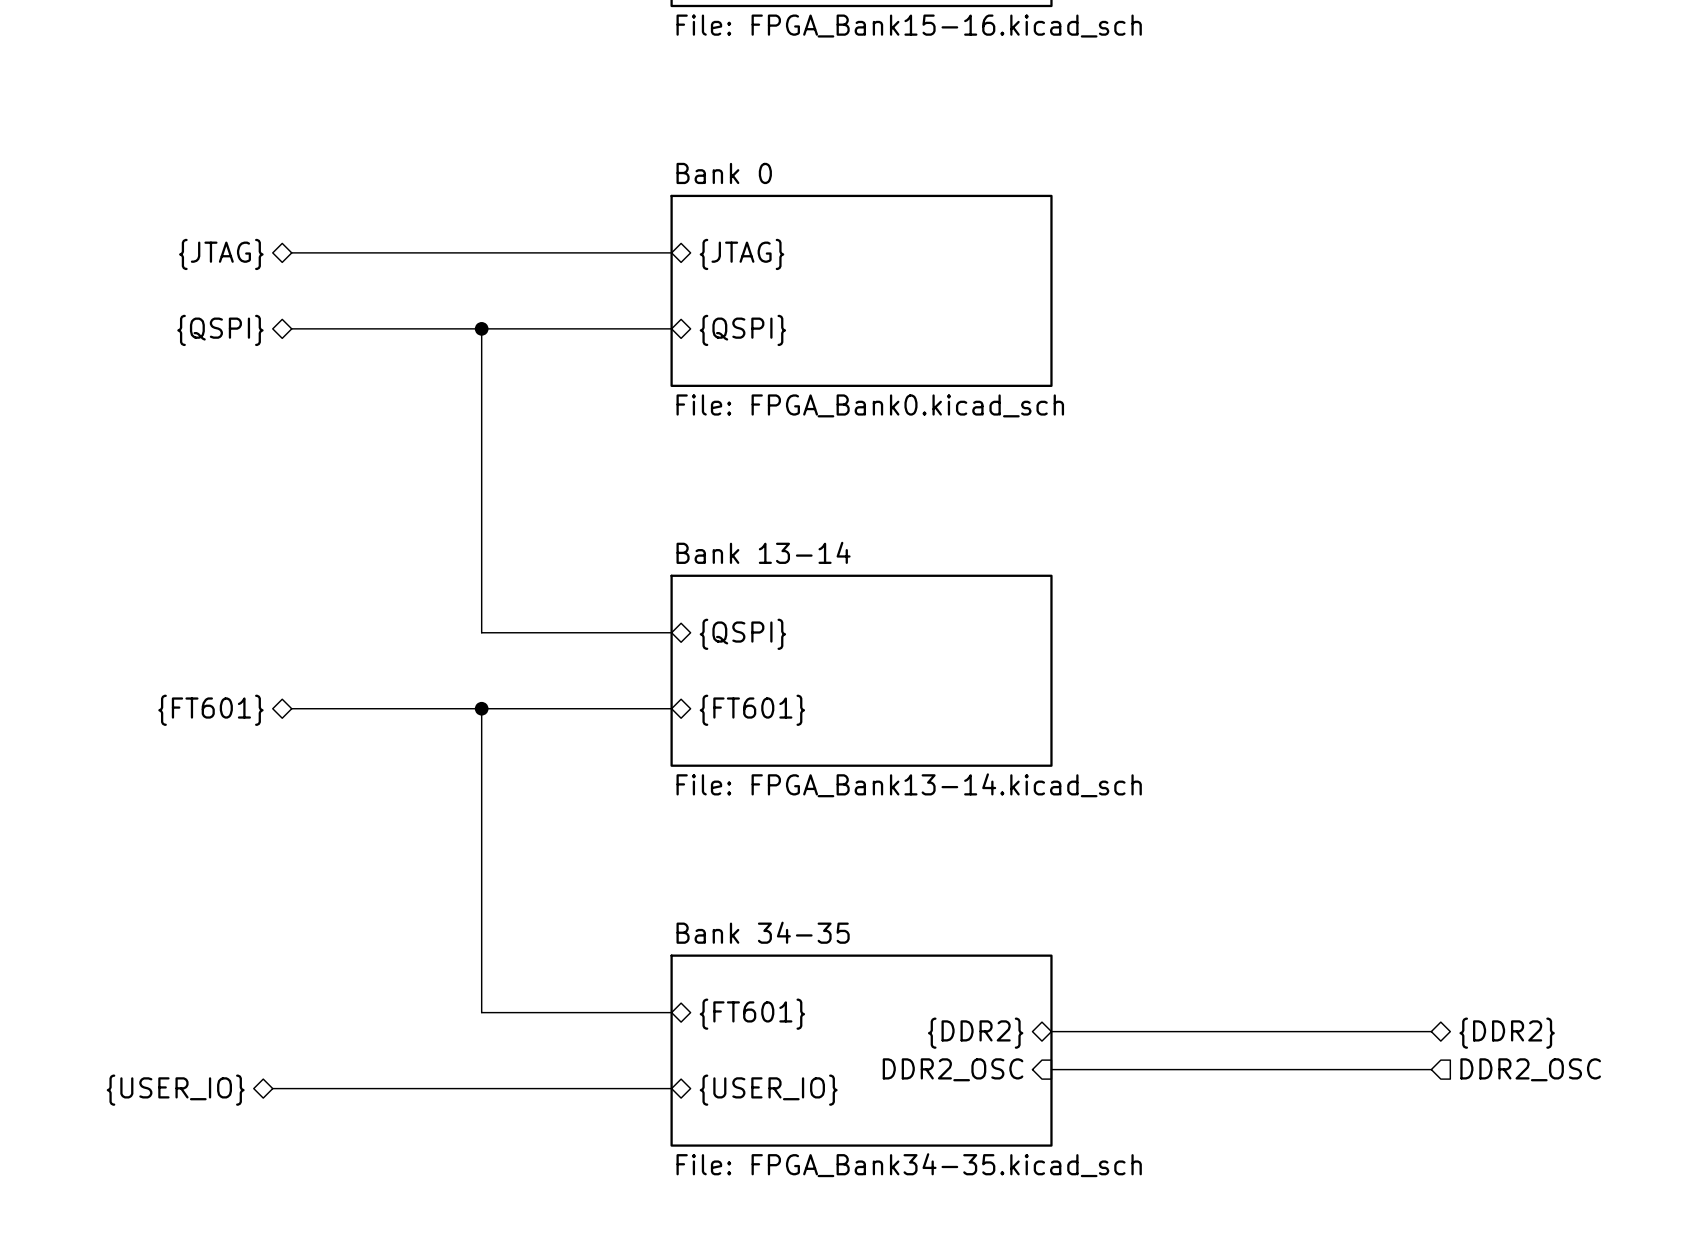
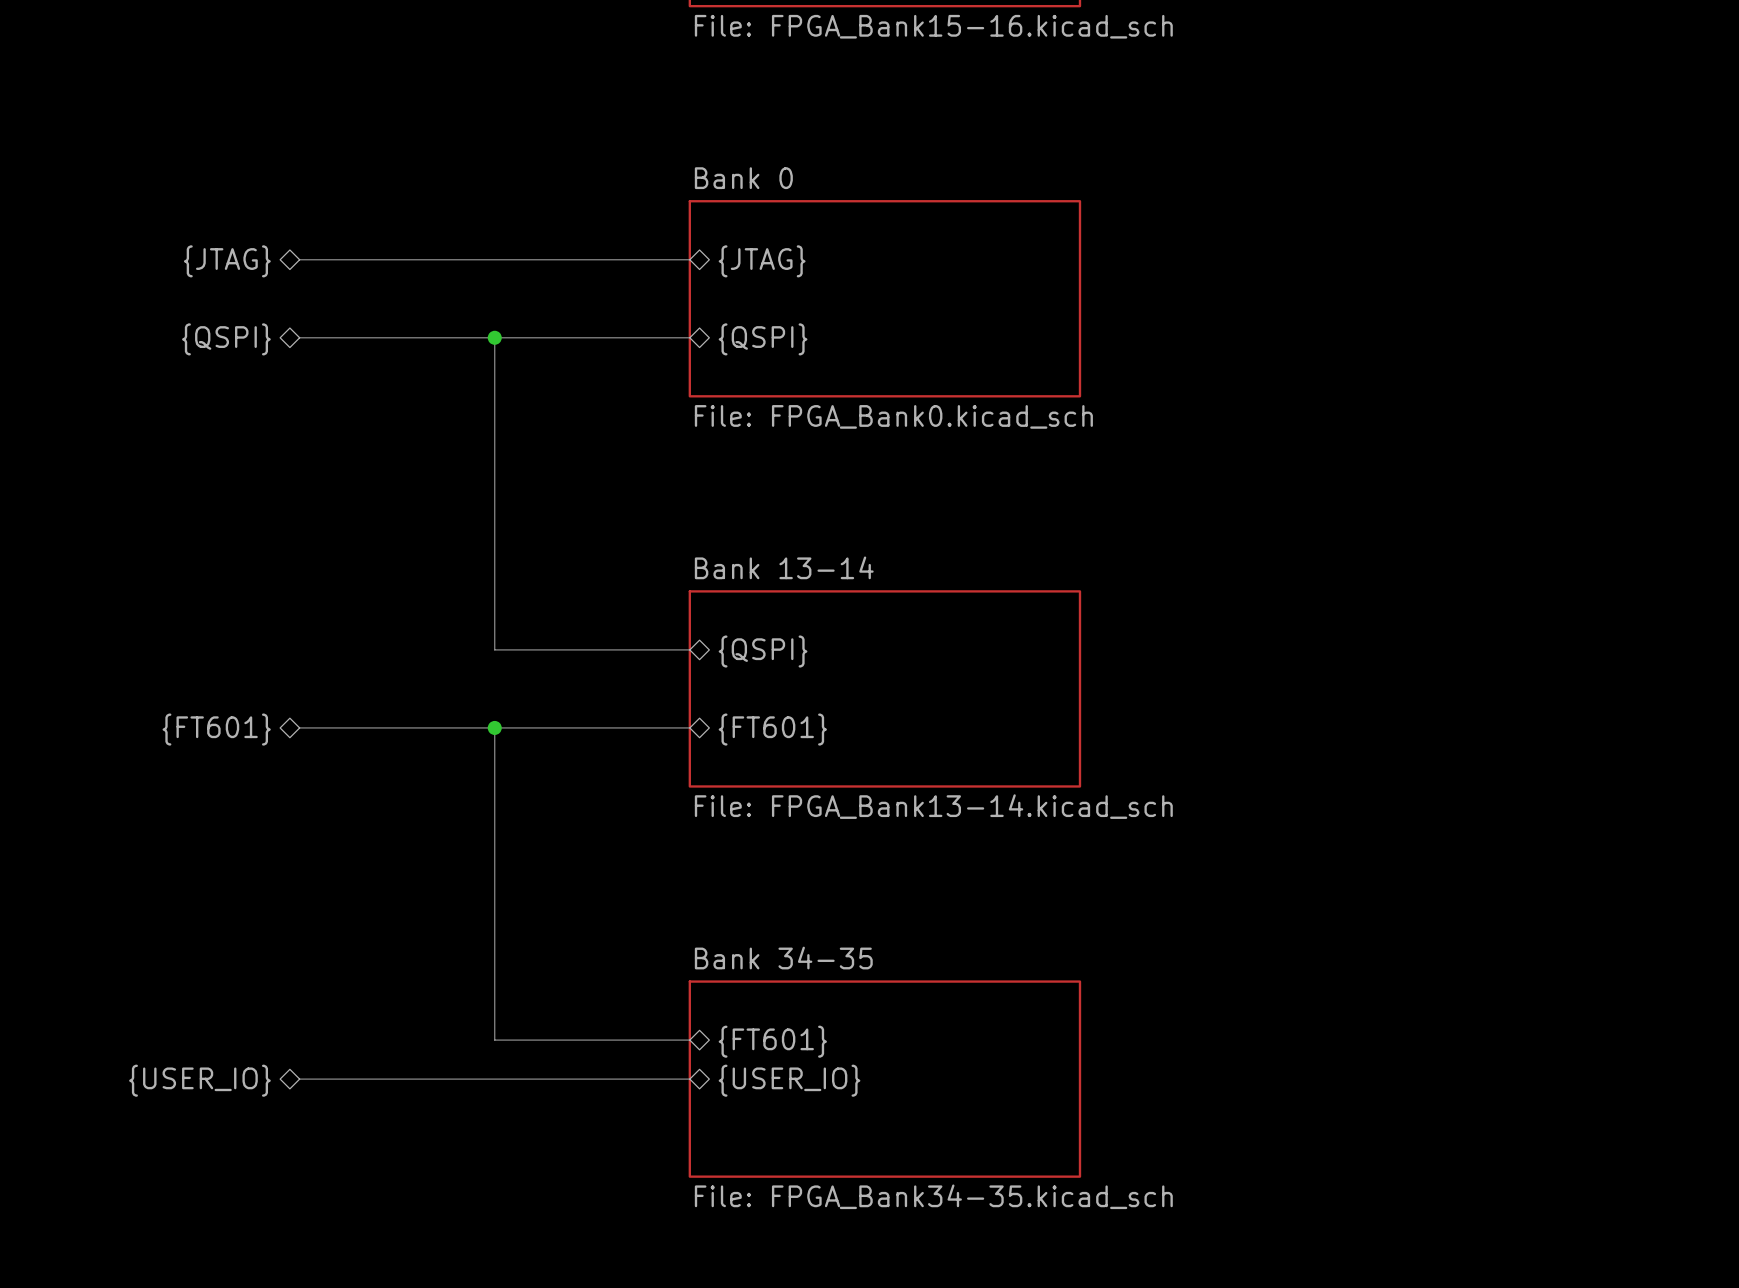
bus: (1051, 1031) (1431, 1031) -> none
sheet pin: {DDR2} (975, 1033) -> none
hierarchical label: {DDR2} (1507, 1033) -> none
bus: none -> (299, 1079) (689, 1079)
sheet pin: DDR2_OSC (953, 1069) -> none
wire: (1051, 1069) (1431, 1069) -> none
hierarchical label: DDR2_OSC (1530, 1069) -> none
bus: (272, 1088) (671, 1088) -> none
hierarchical label position: {USER_IO} (175, 1090) -> {USER_IO} (199, 1080)
sheet pin position: {USER_IO} (768, 1090) -> {USER_IO} (789, 1080)

